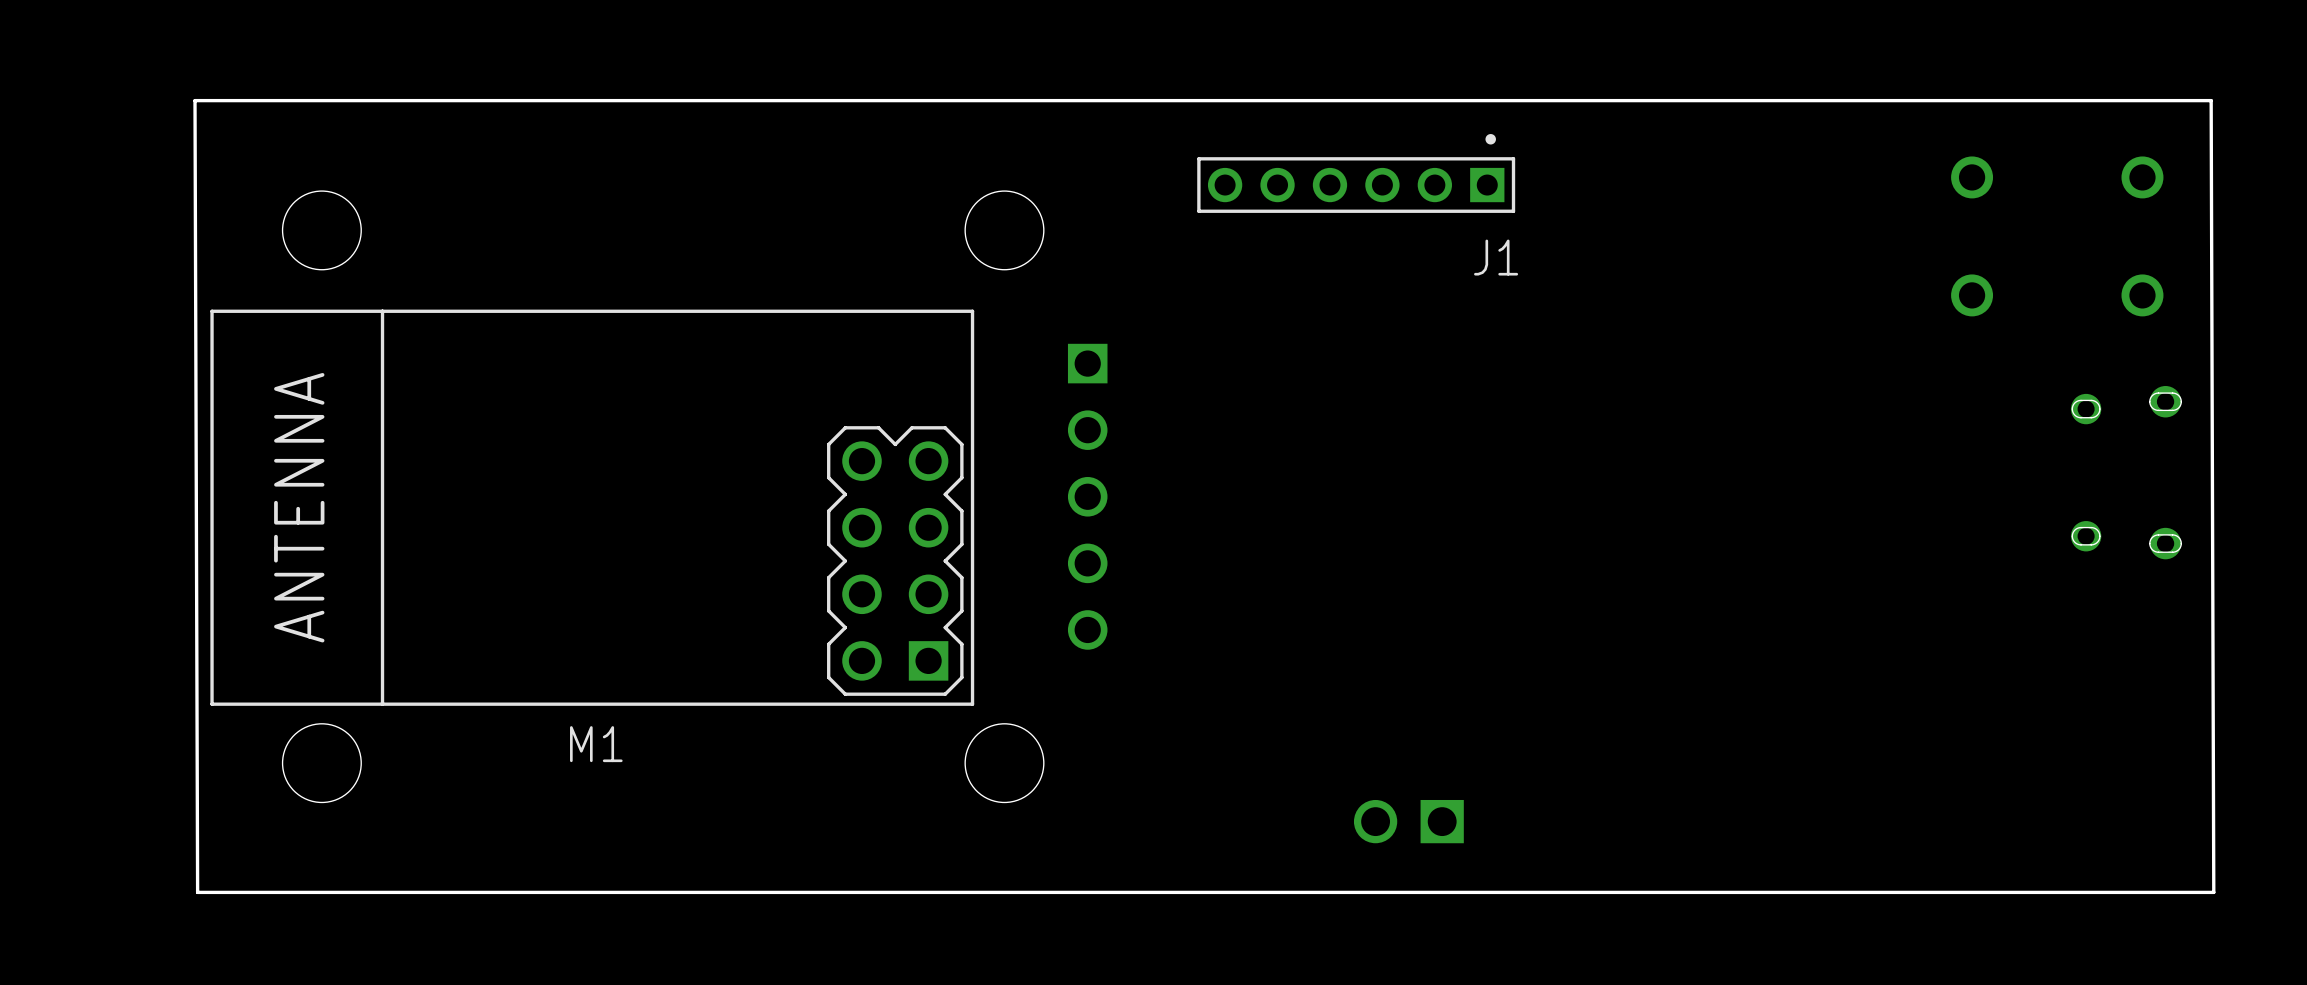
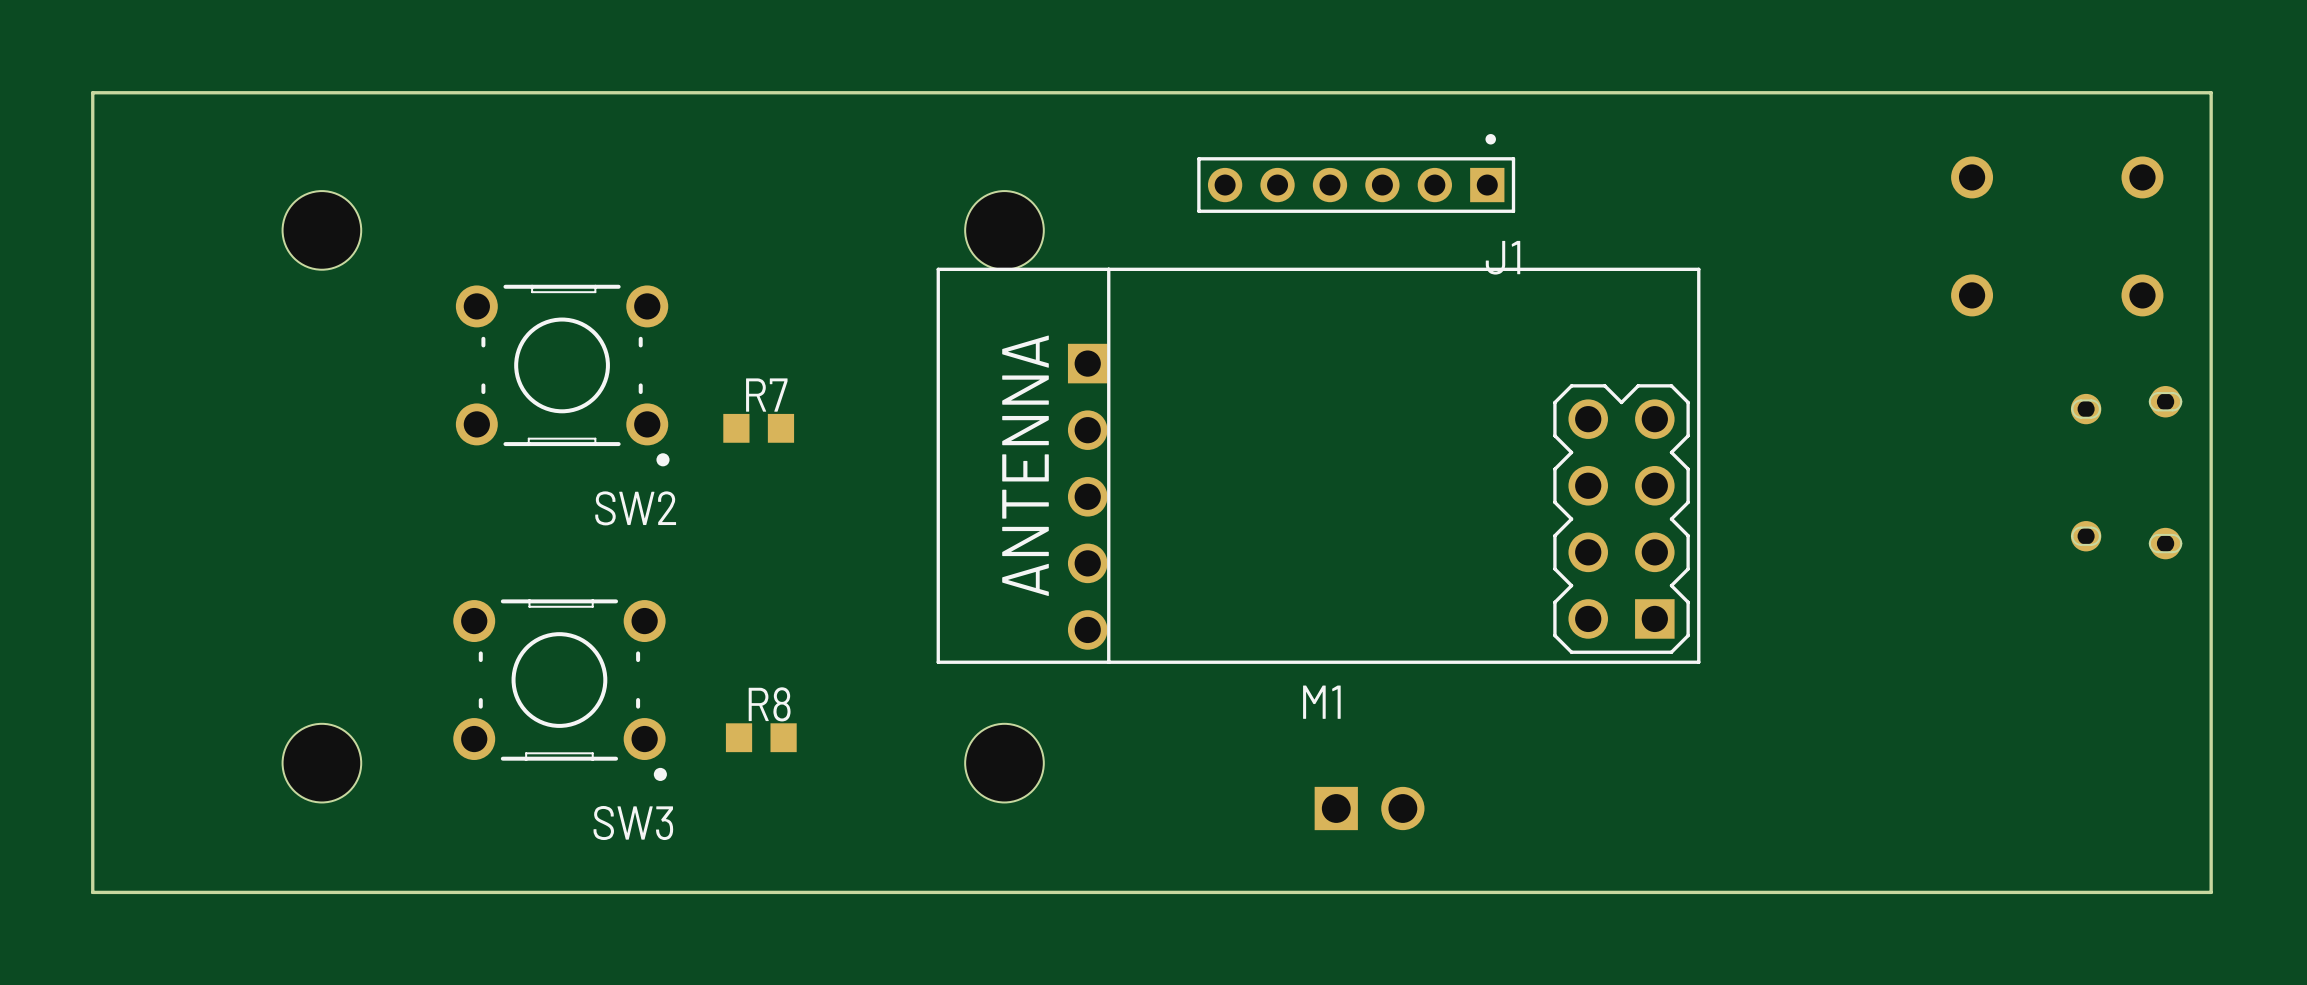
SW2: none -> (562, 375)
R7: none -> (758, 428)
M1 position: (592, 507) -> (1318, 465)
SW3: none -> (560, 690)
R8: none -> (761, 737)
part rotation: 0° (1408, 821) -> 180° (1369, 808)
board edge: (2211, 892) (2213, 892) (2211, 100) (195, 100) (197, 892) -> (2211, 892) (2211, 92) (92, 92) (92, 892) (197, 892)

